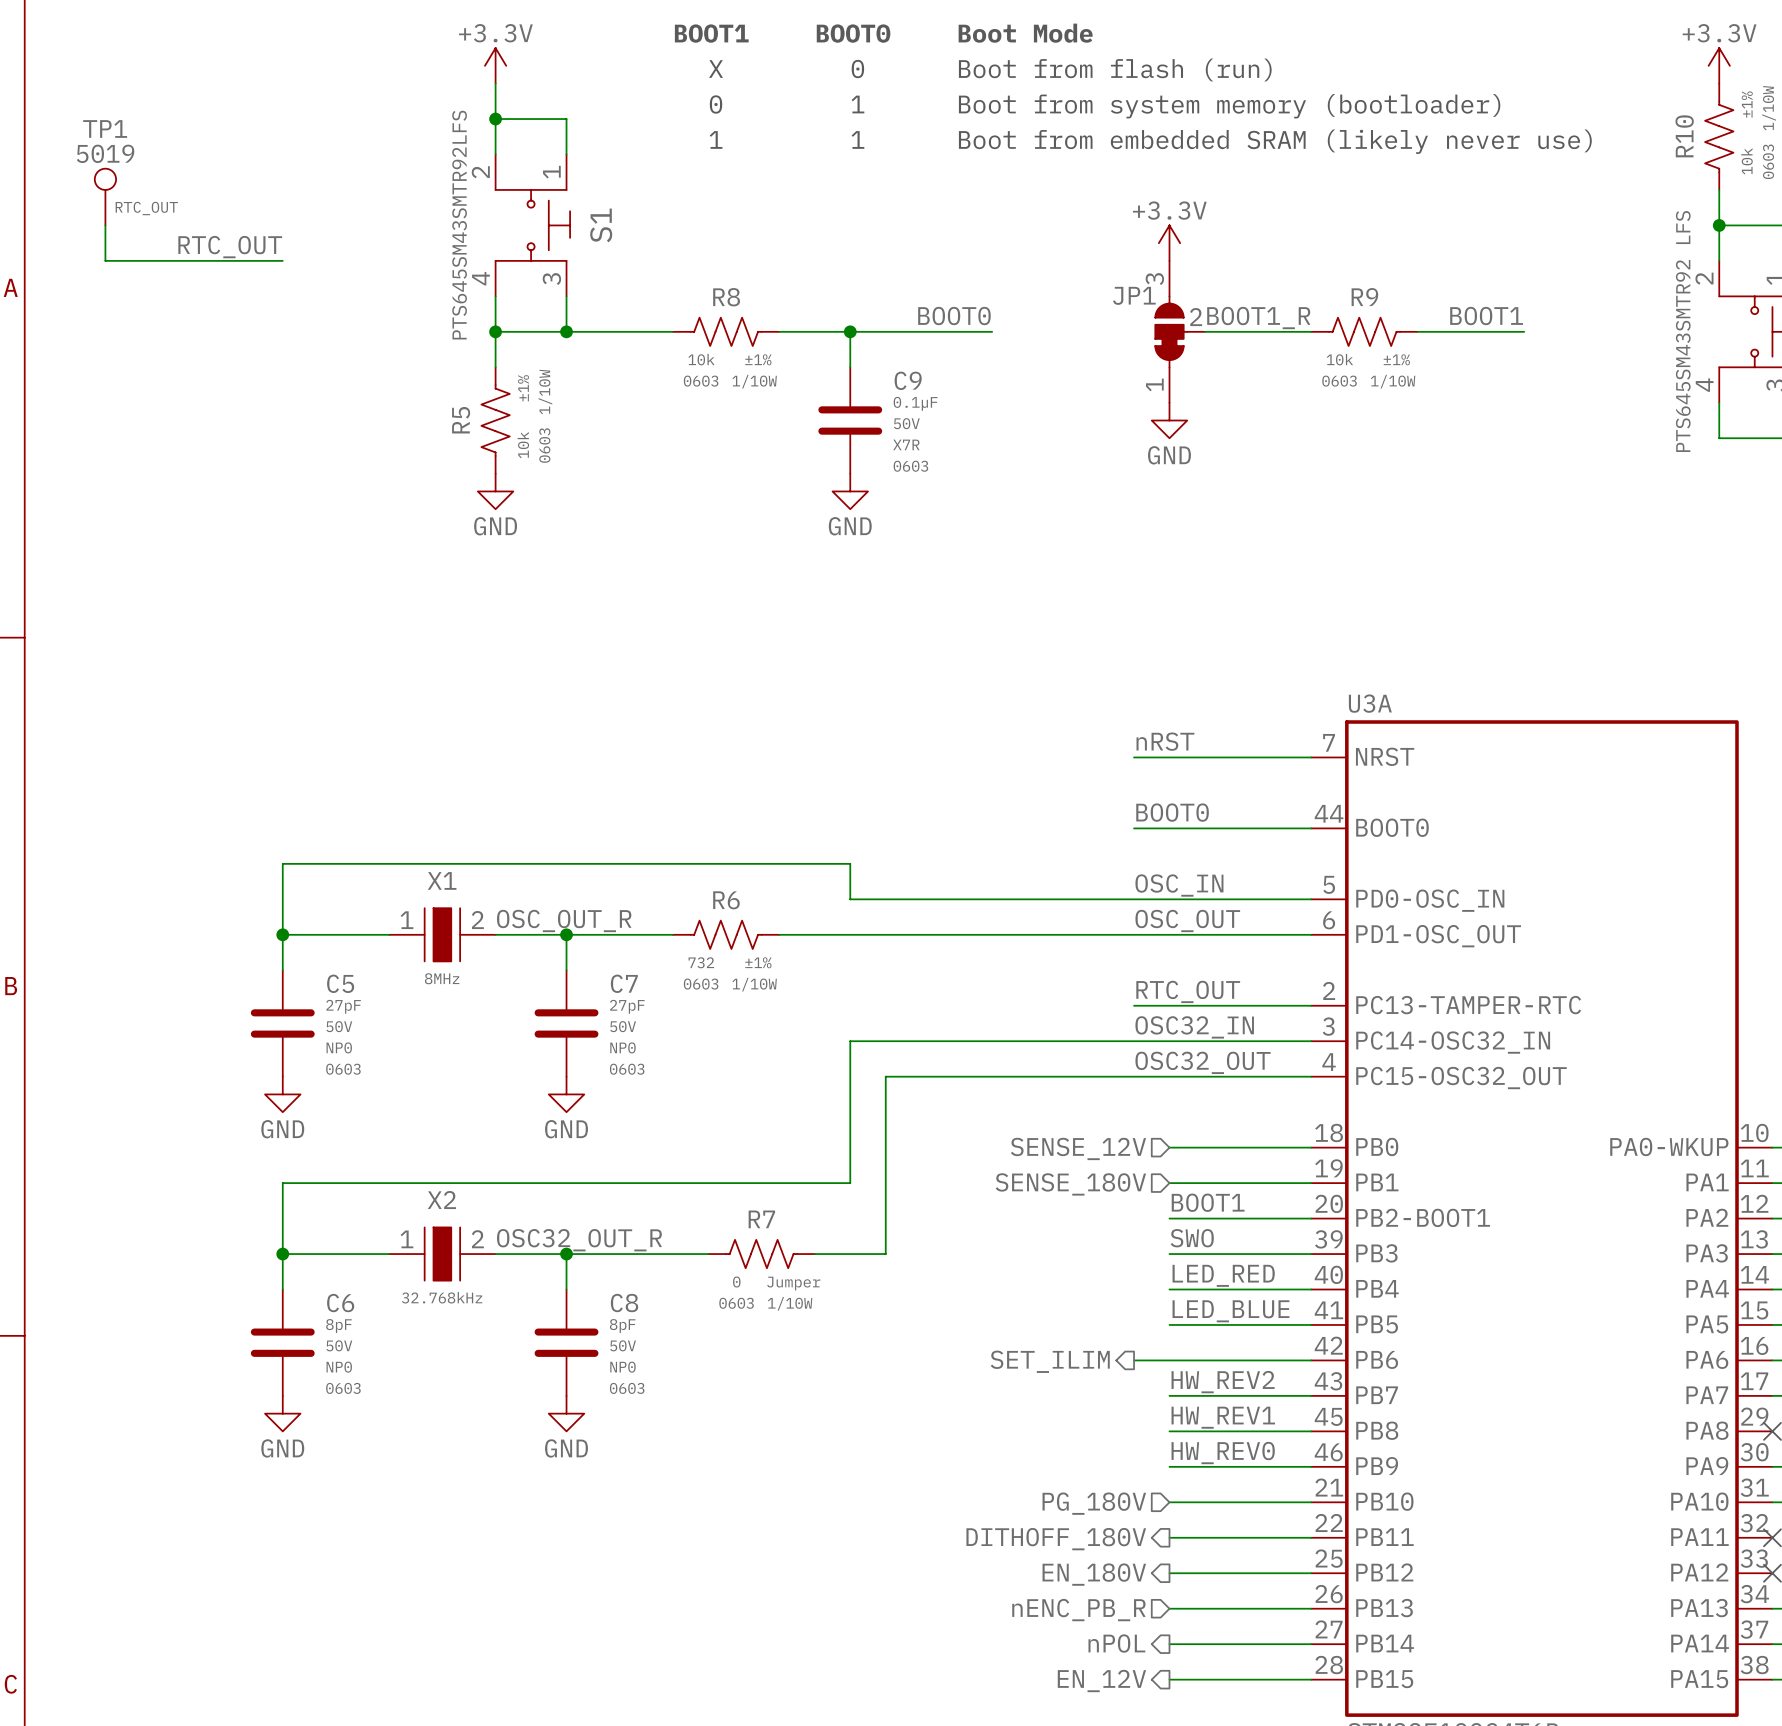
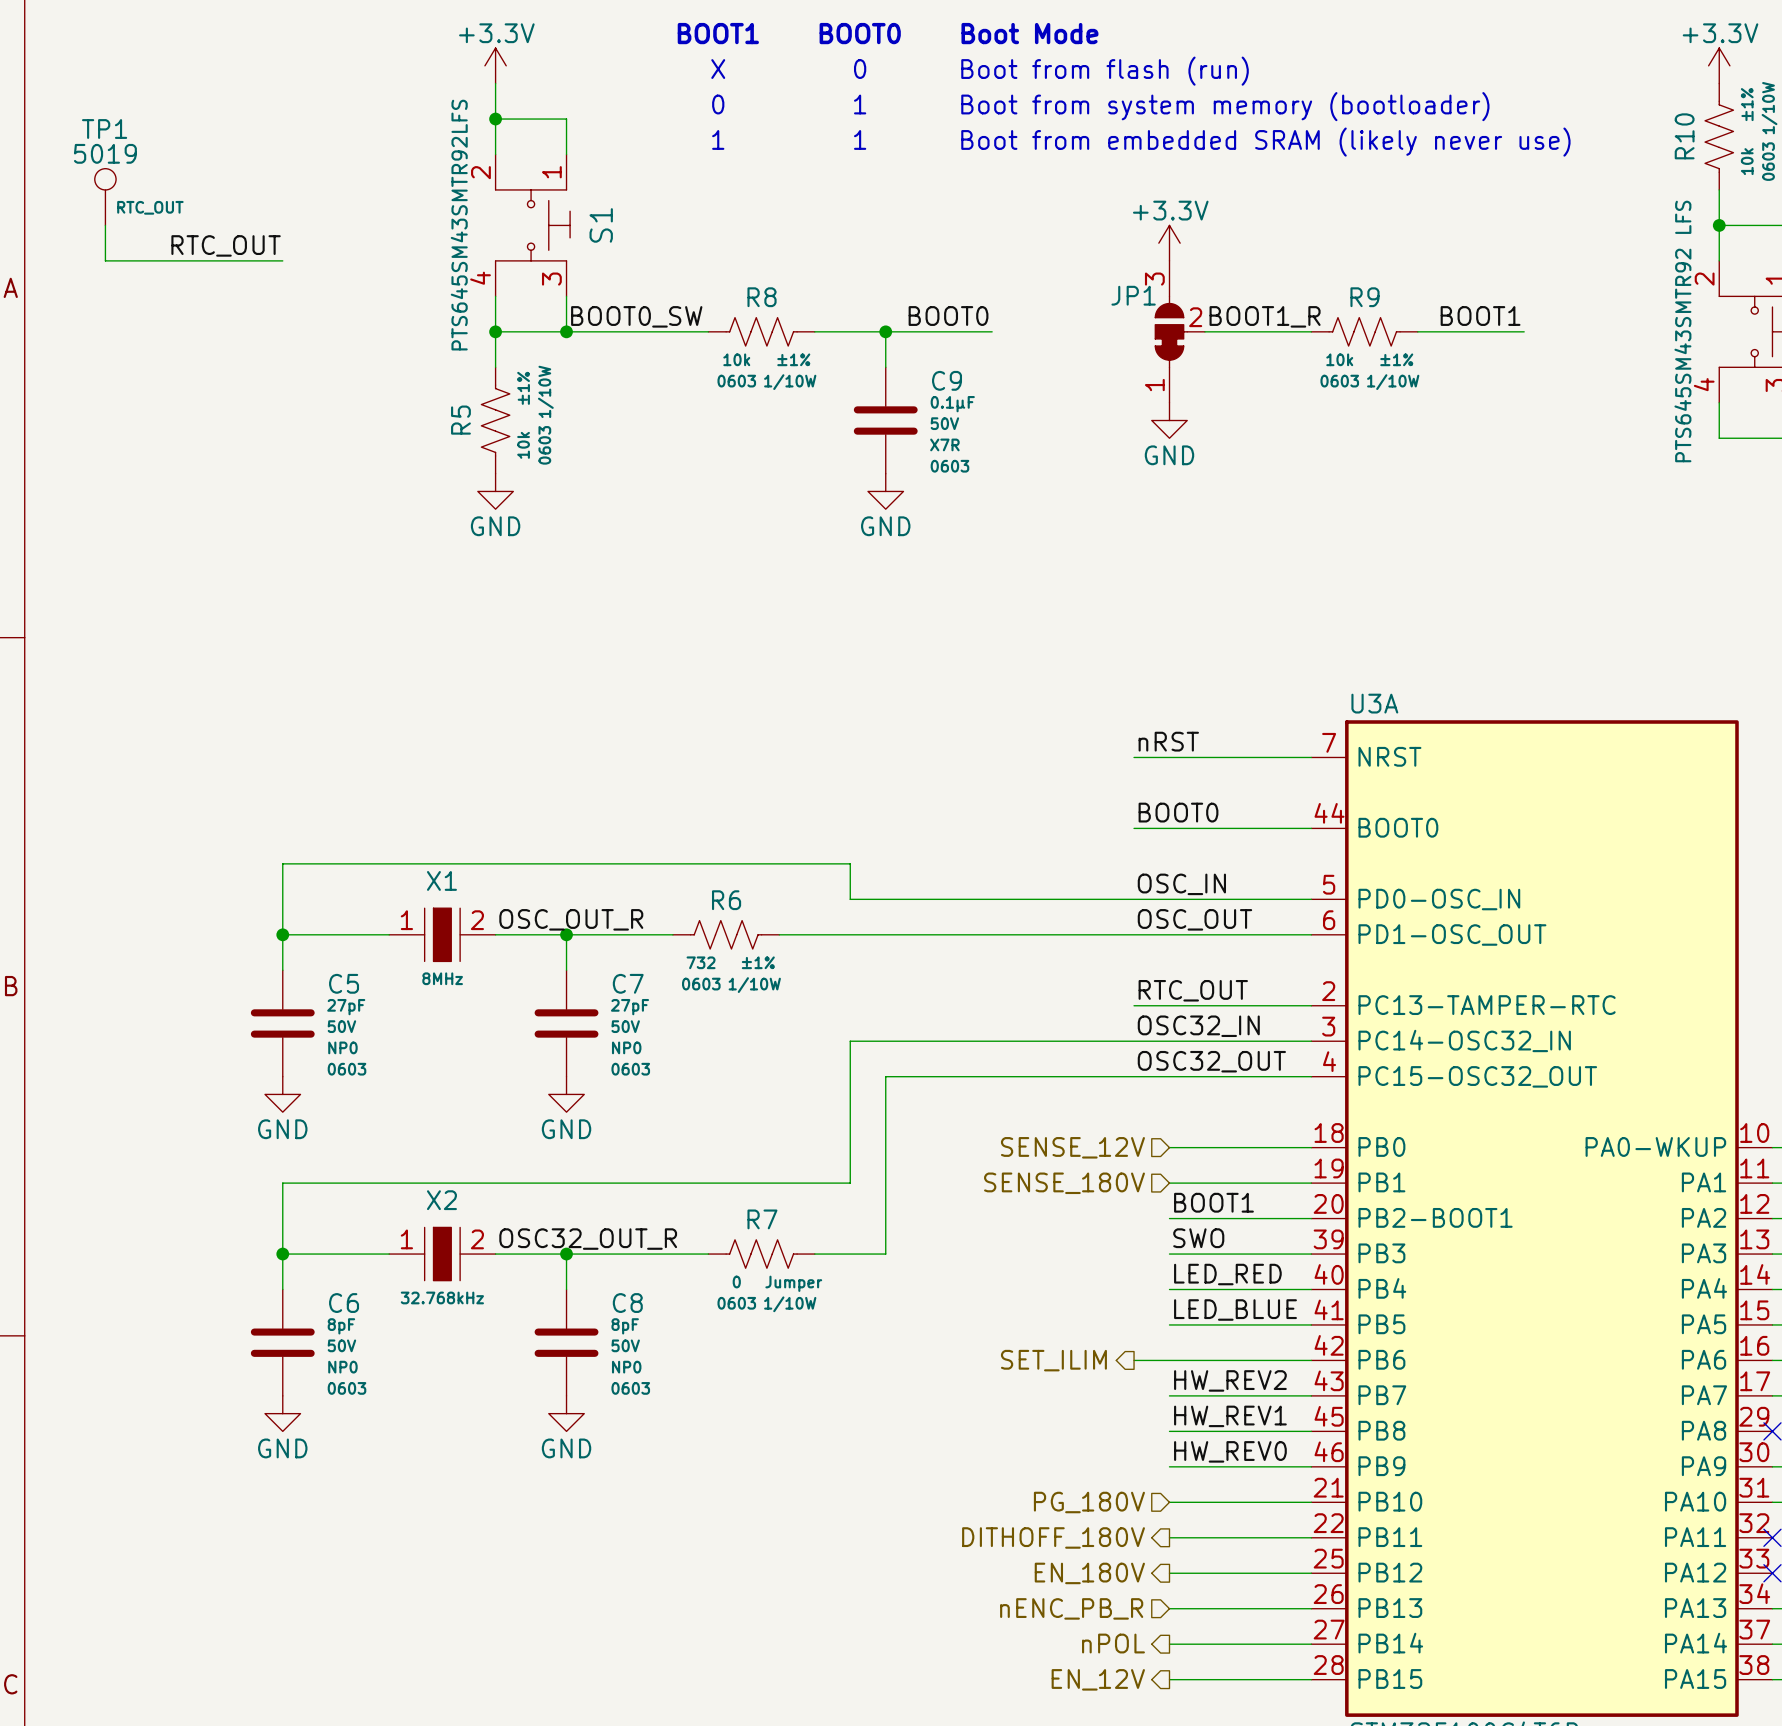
label: none -> BOOT0_SW (636, 316)
R8 position: (726, 331) -> (761, 331)
wire: (850, 331) (850, 367) -> (885, 331) (885, 367)
junction position: (850, 331) -> (885, 331)
C9 position: (850, 420) -> (885, 420)
power symbol position: GND (850, 491) -> GND (885, 491)

